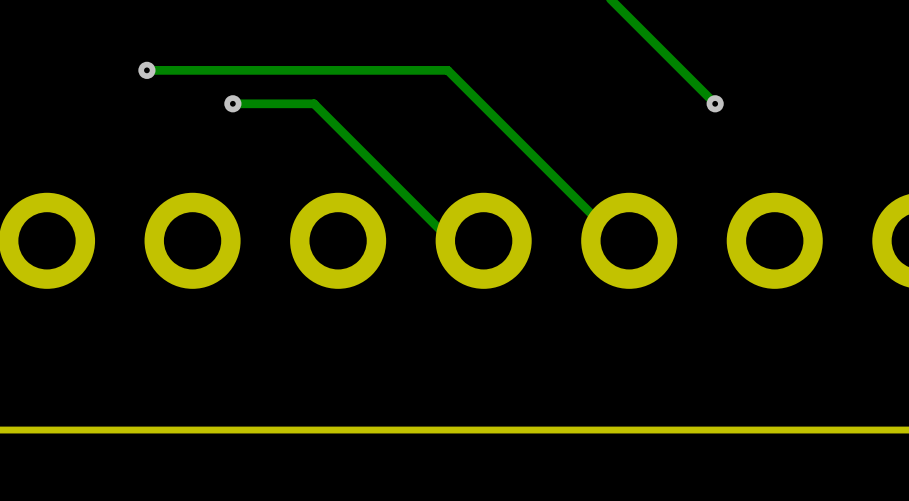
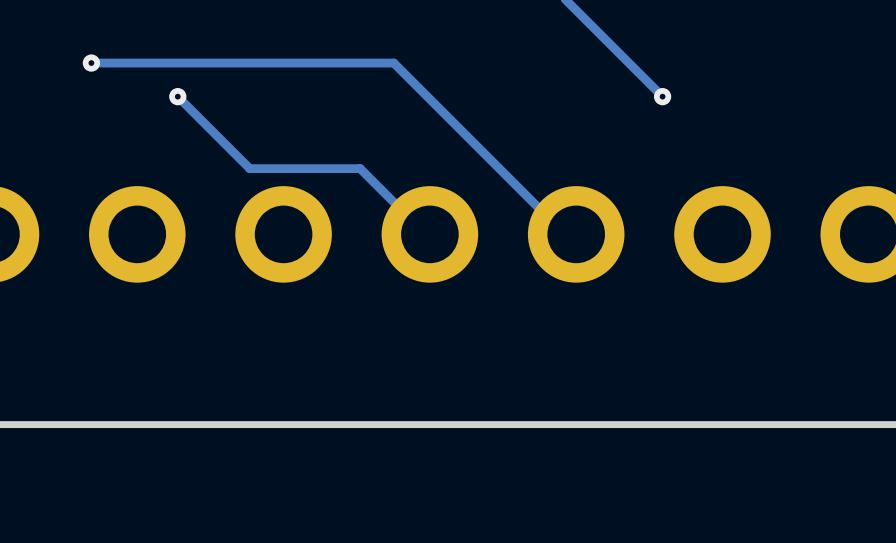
track: (232, 103) (314, 103) (447, 237) -> (177, 96) (249, 168) (360, 168) (398, 207)

